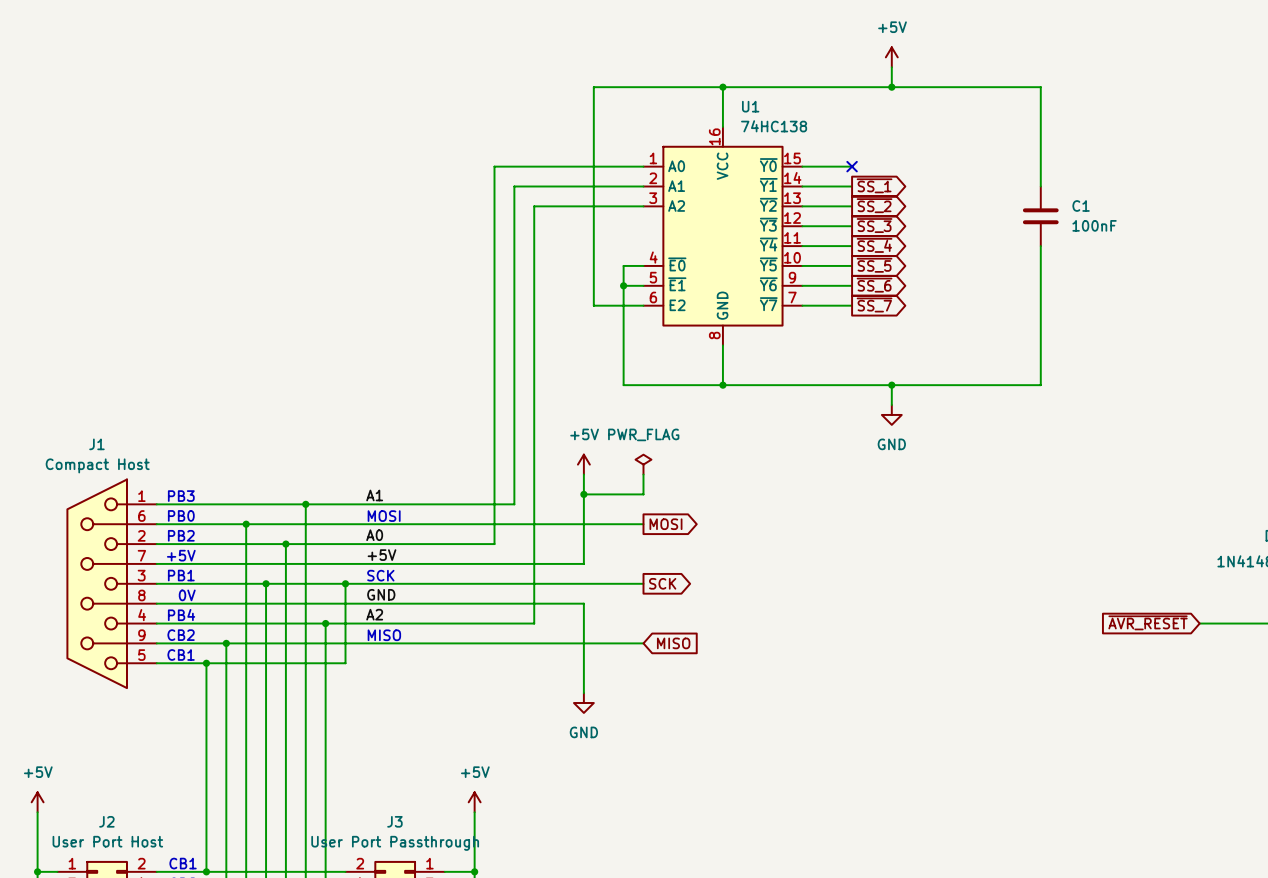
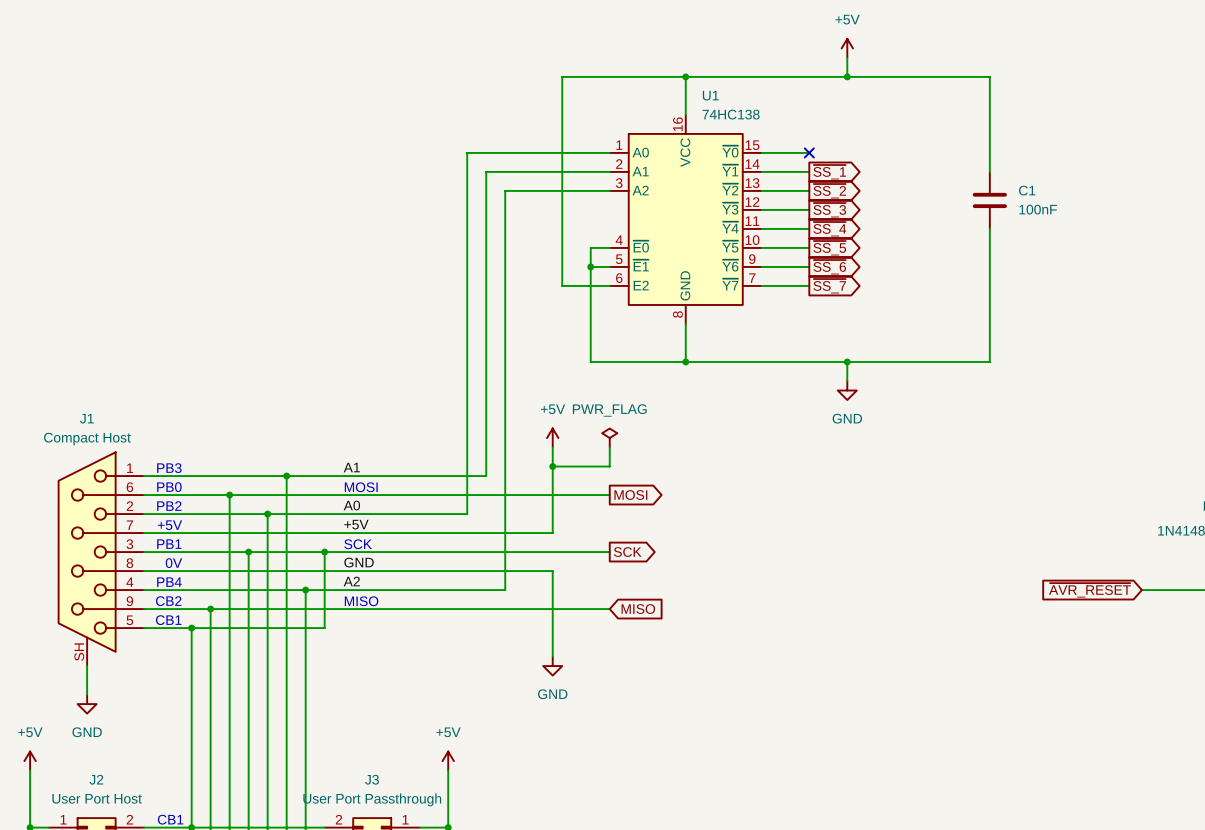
J1 symbol: [66, 478, 157, 690] -> [57, 451, 145, 667]
wire: none -> (87, 666) (87, 694)
power symbol: none -> GND (87, 704)

